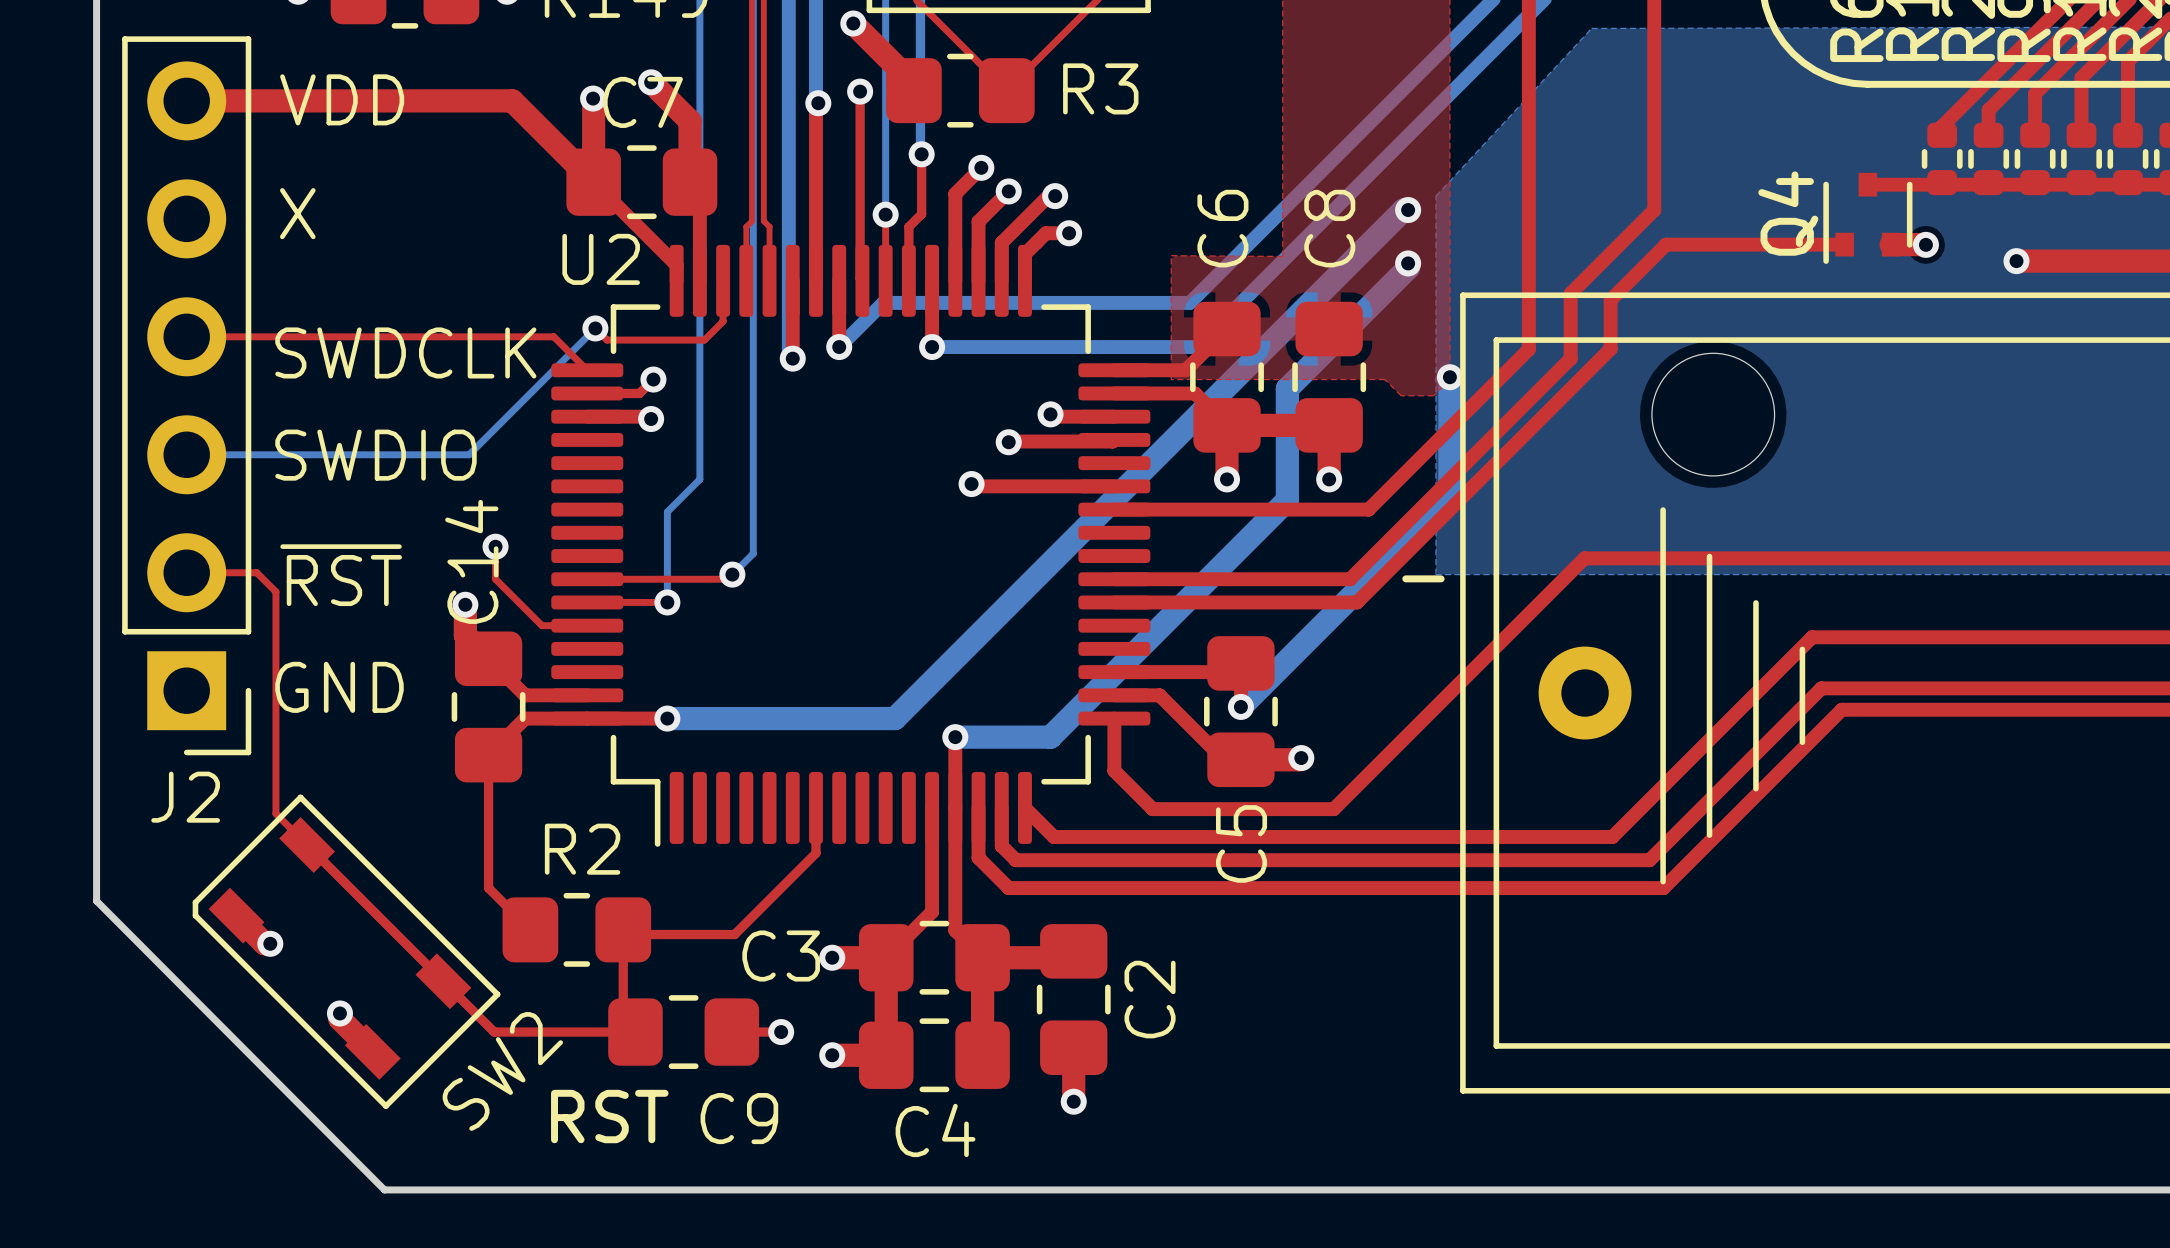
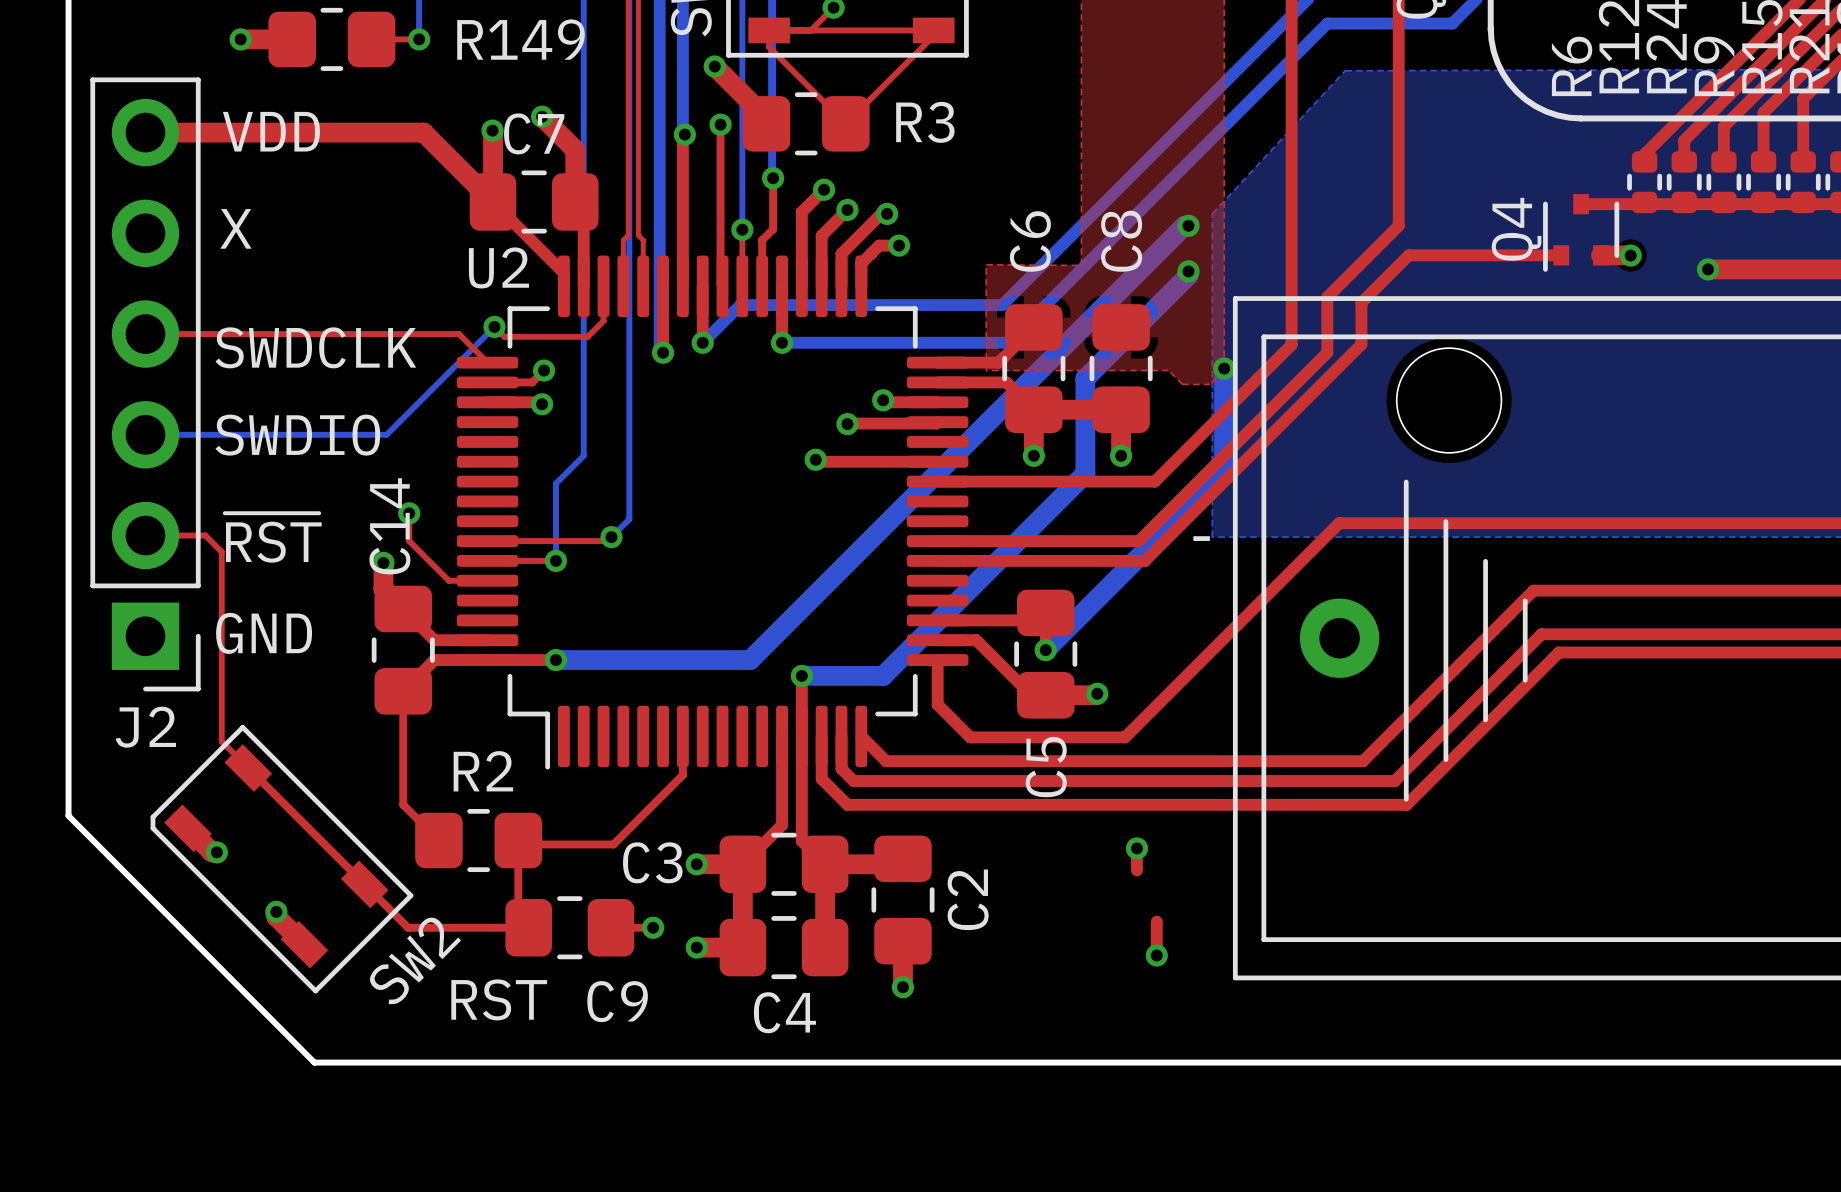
top track: none -> (1136, 848) (1136, 870)
via: none -> (1136, 848)
top track: none -> (1156, 921) (1156, 955)
via: none -> (1156, 955)

